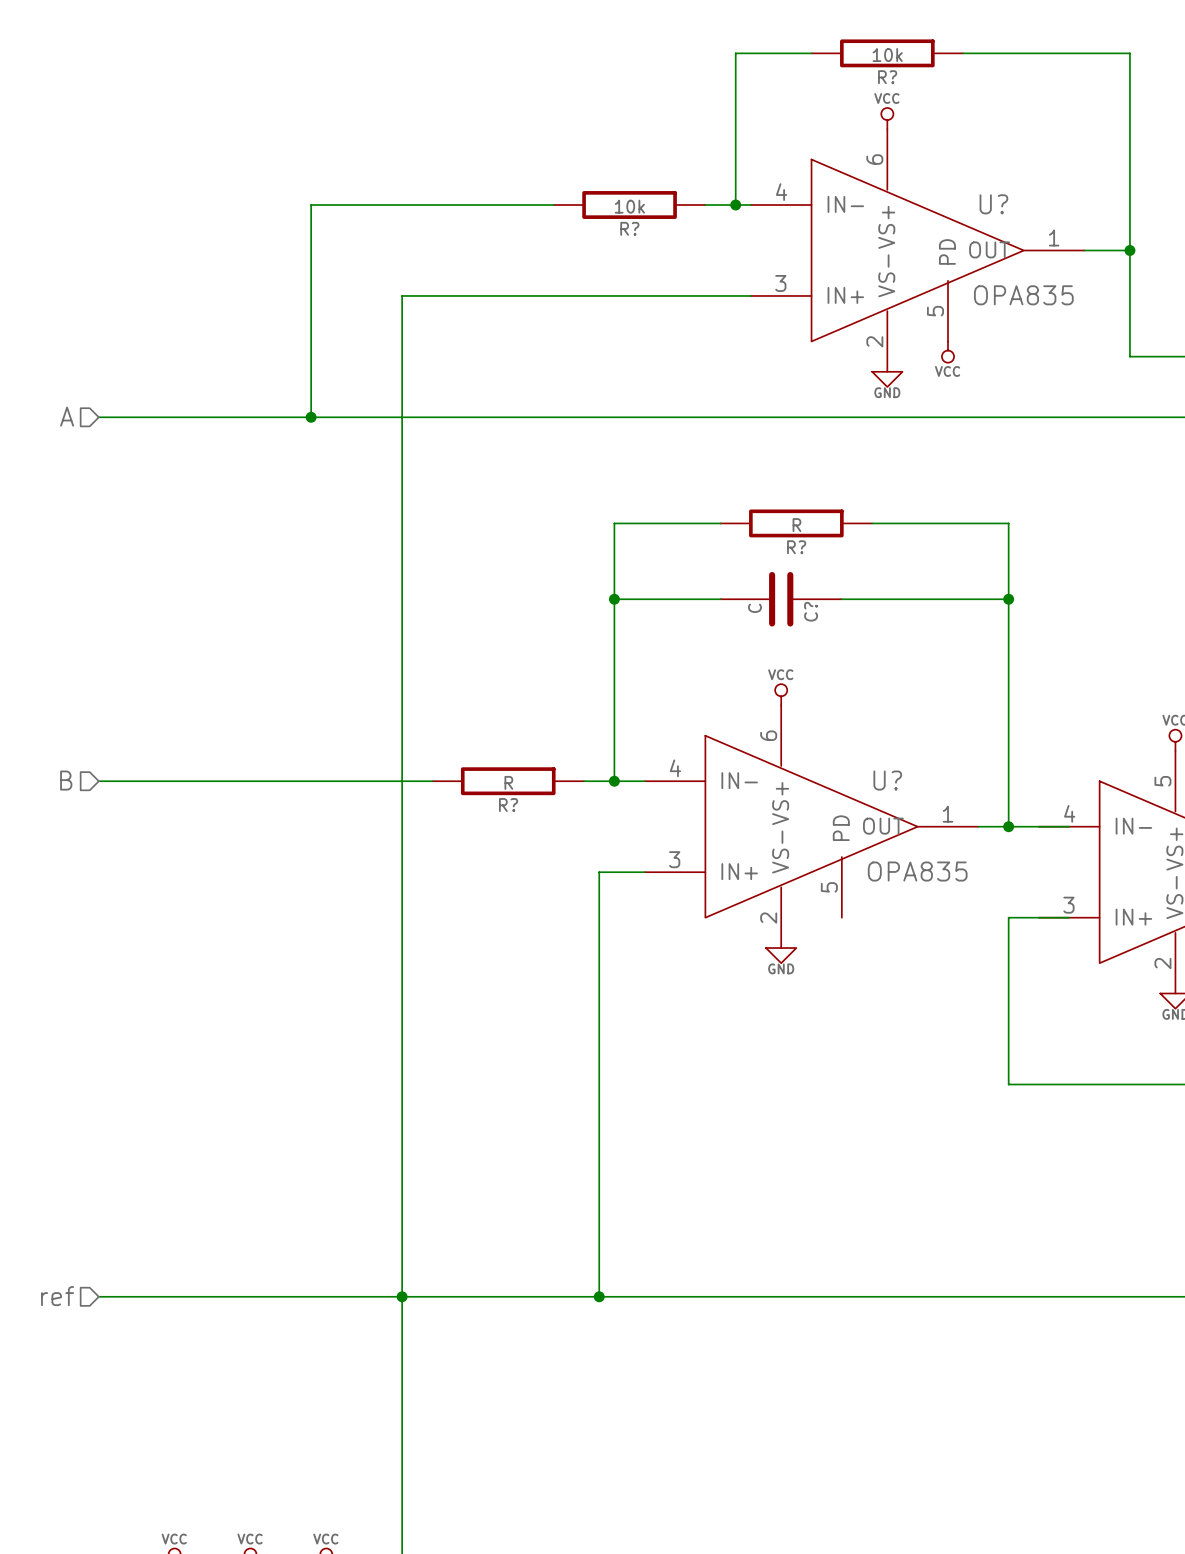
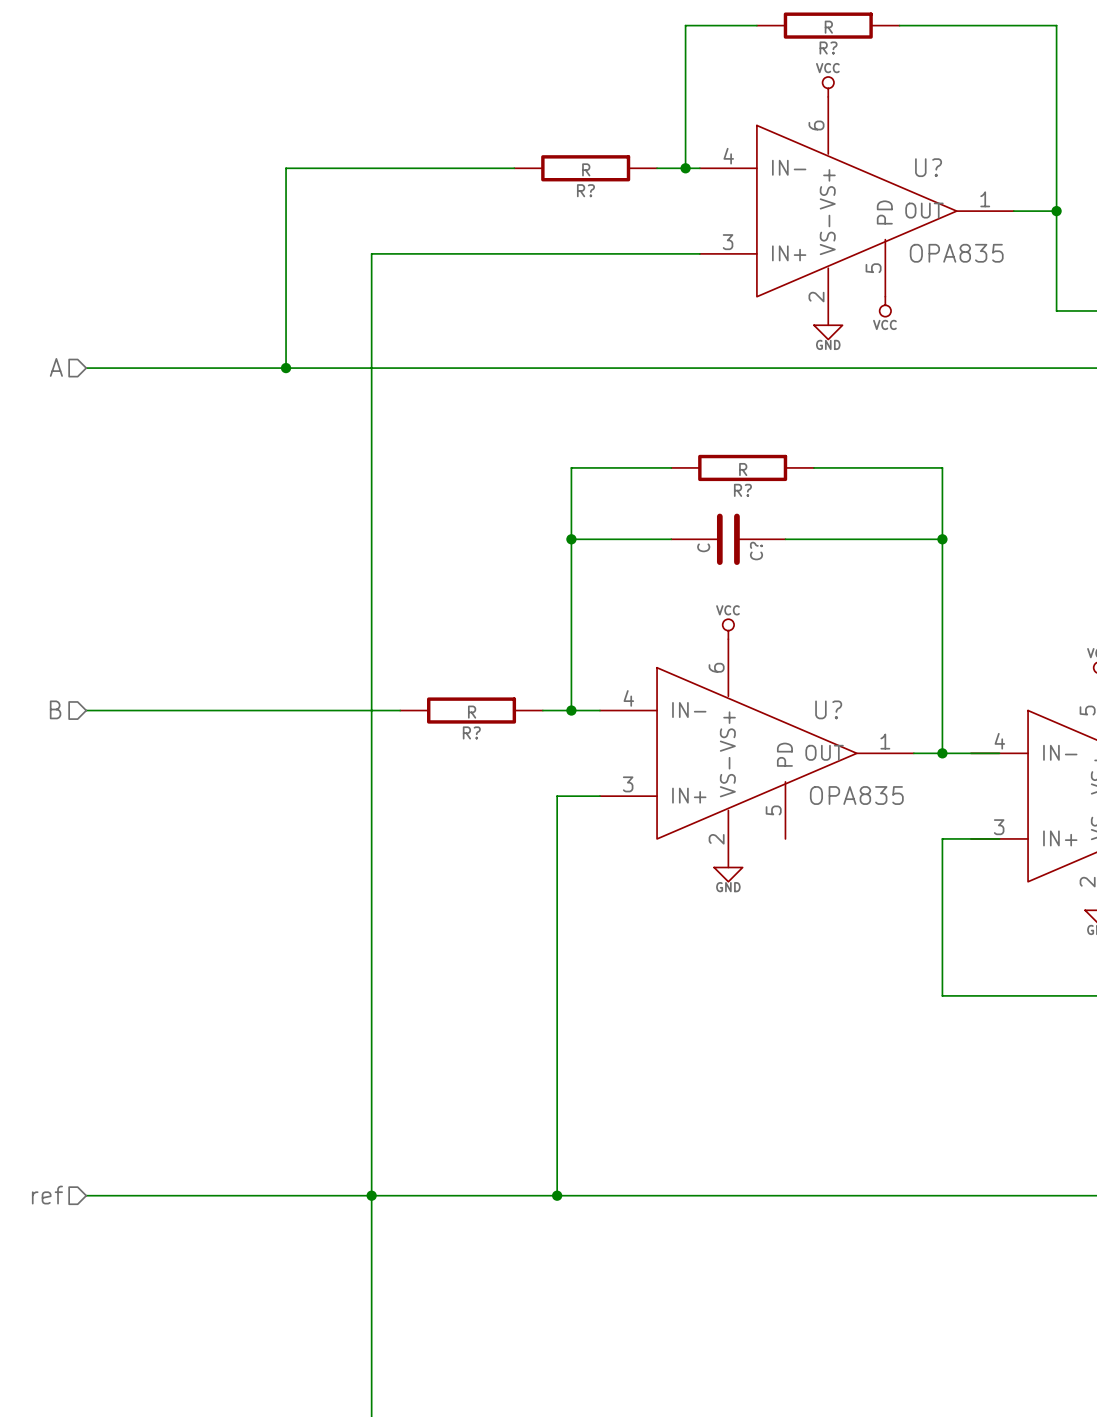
R? value: 10k (887, 55) -> R (828, 27)
R? value: 10k (629, 206) -> R (586, 169)

